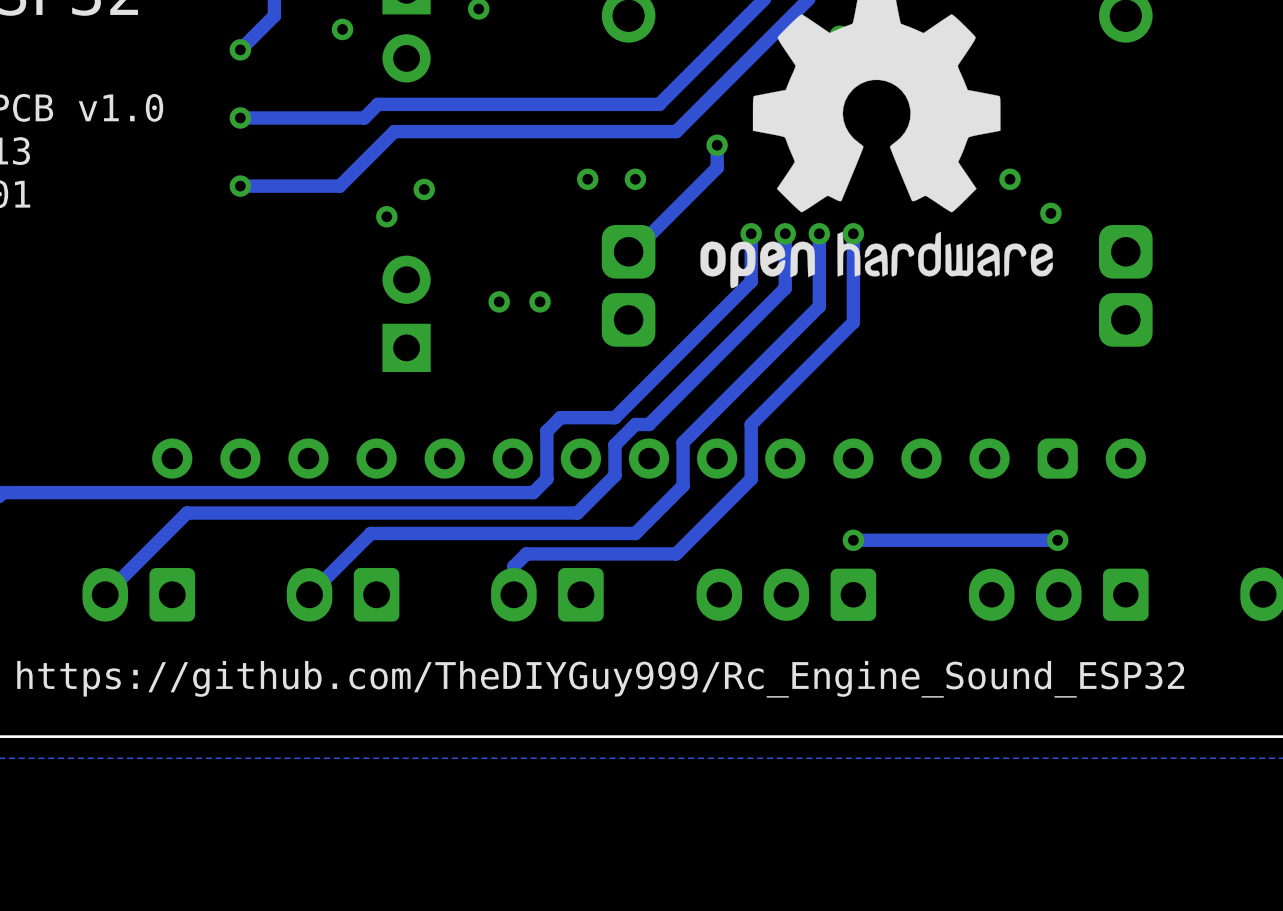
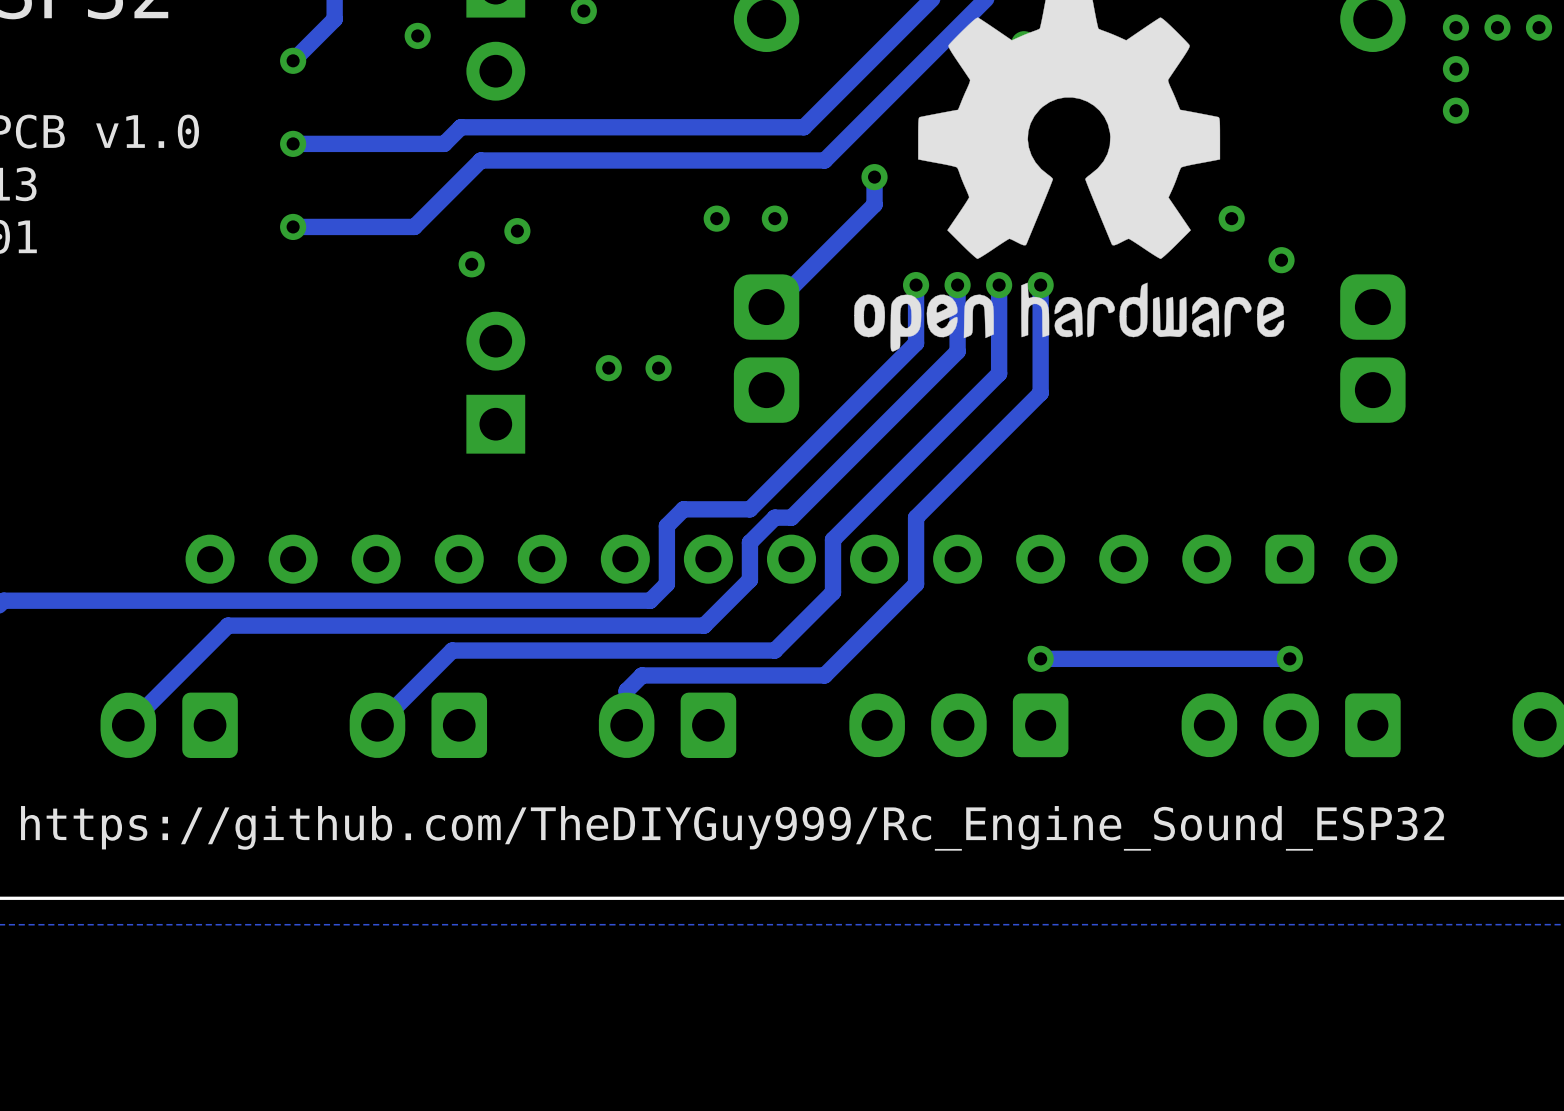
via: none -> (1455, 27)
via: none -> (1497, 27)
via: none -> (1539, 27)
via: none -> (1455, 69)
via: none -> (1455, 110)

